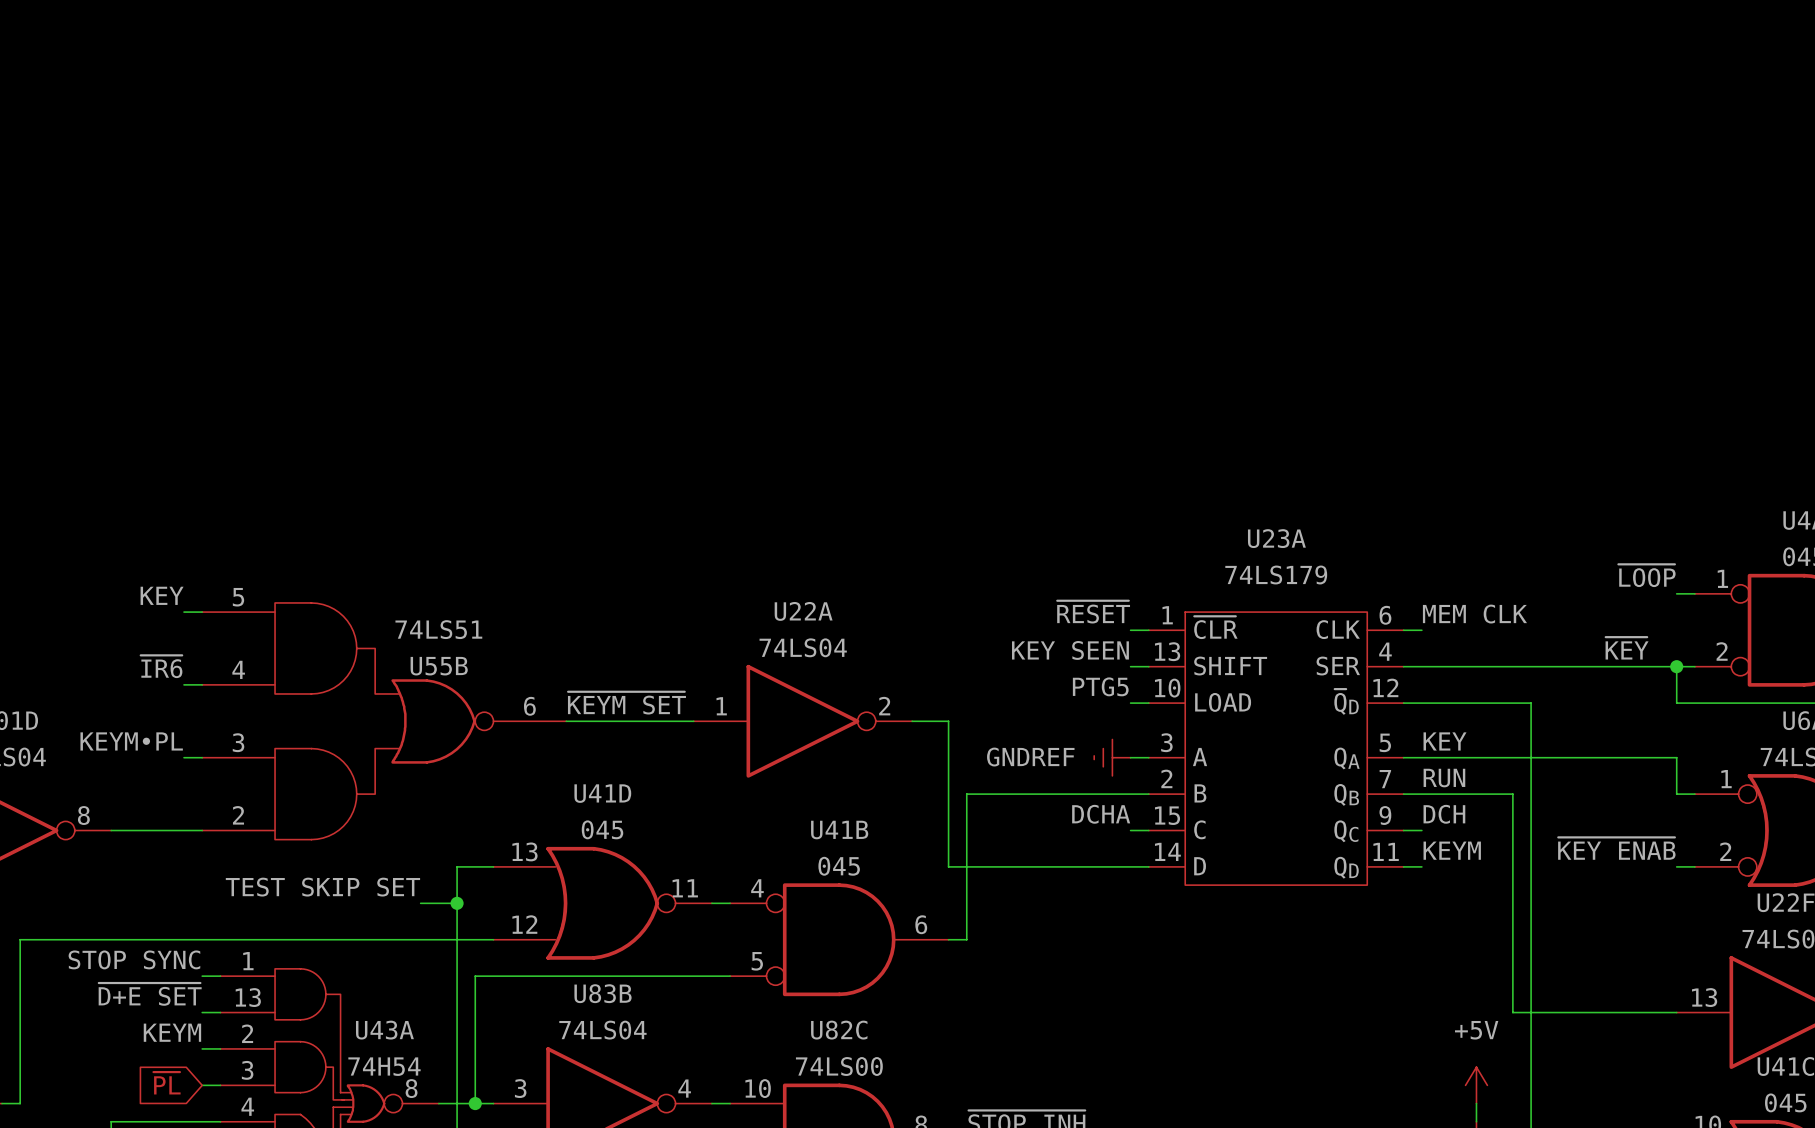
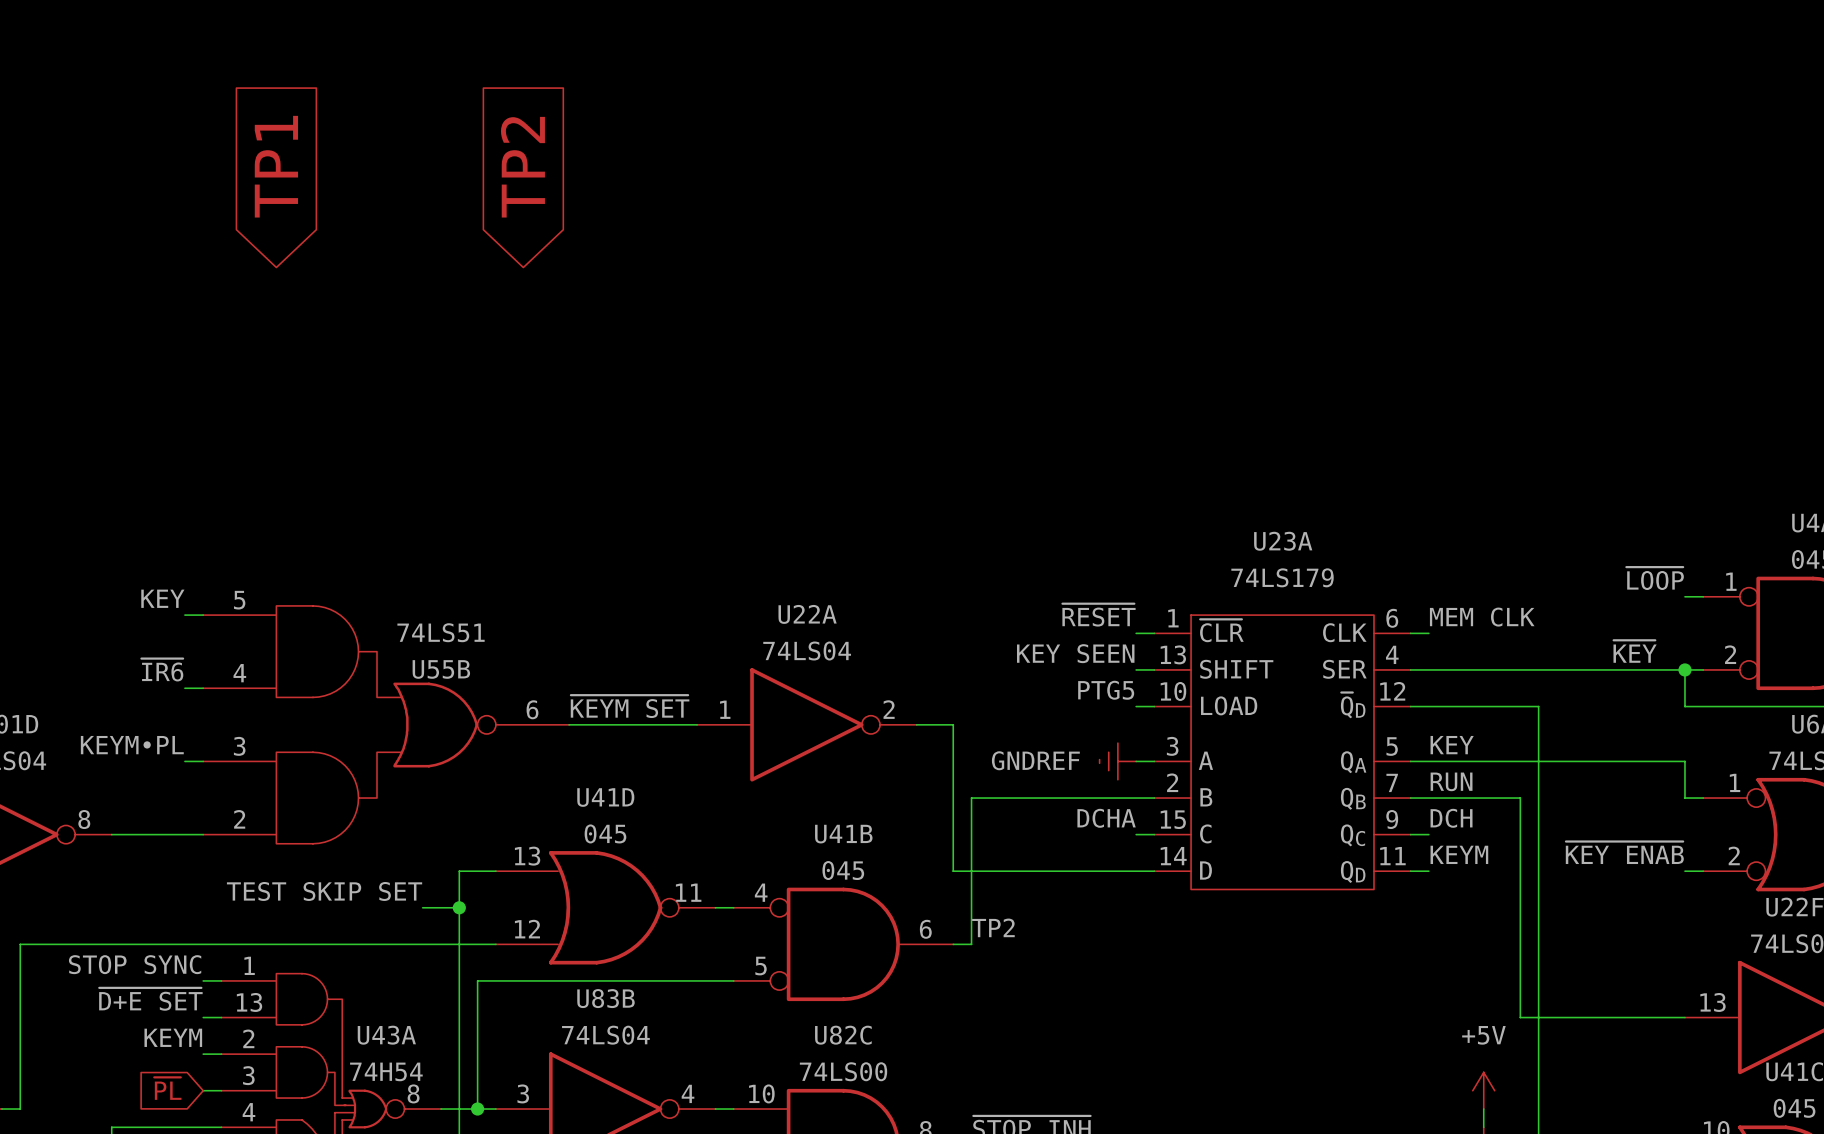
global label: none -> TP1 (276, 166)
global label: none -> TP2 (522, 167)
label: none -> TP2 (993, 927)

